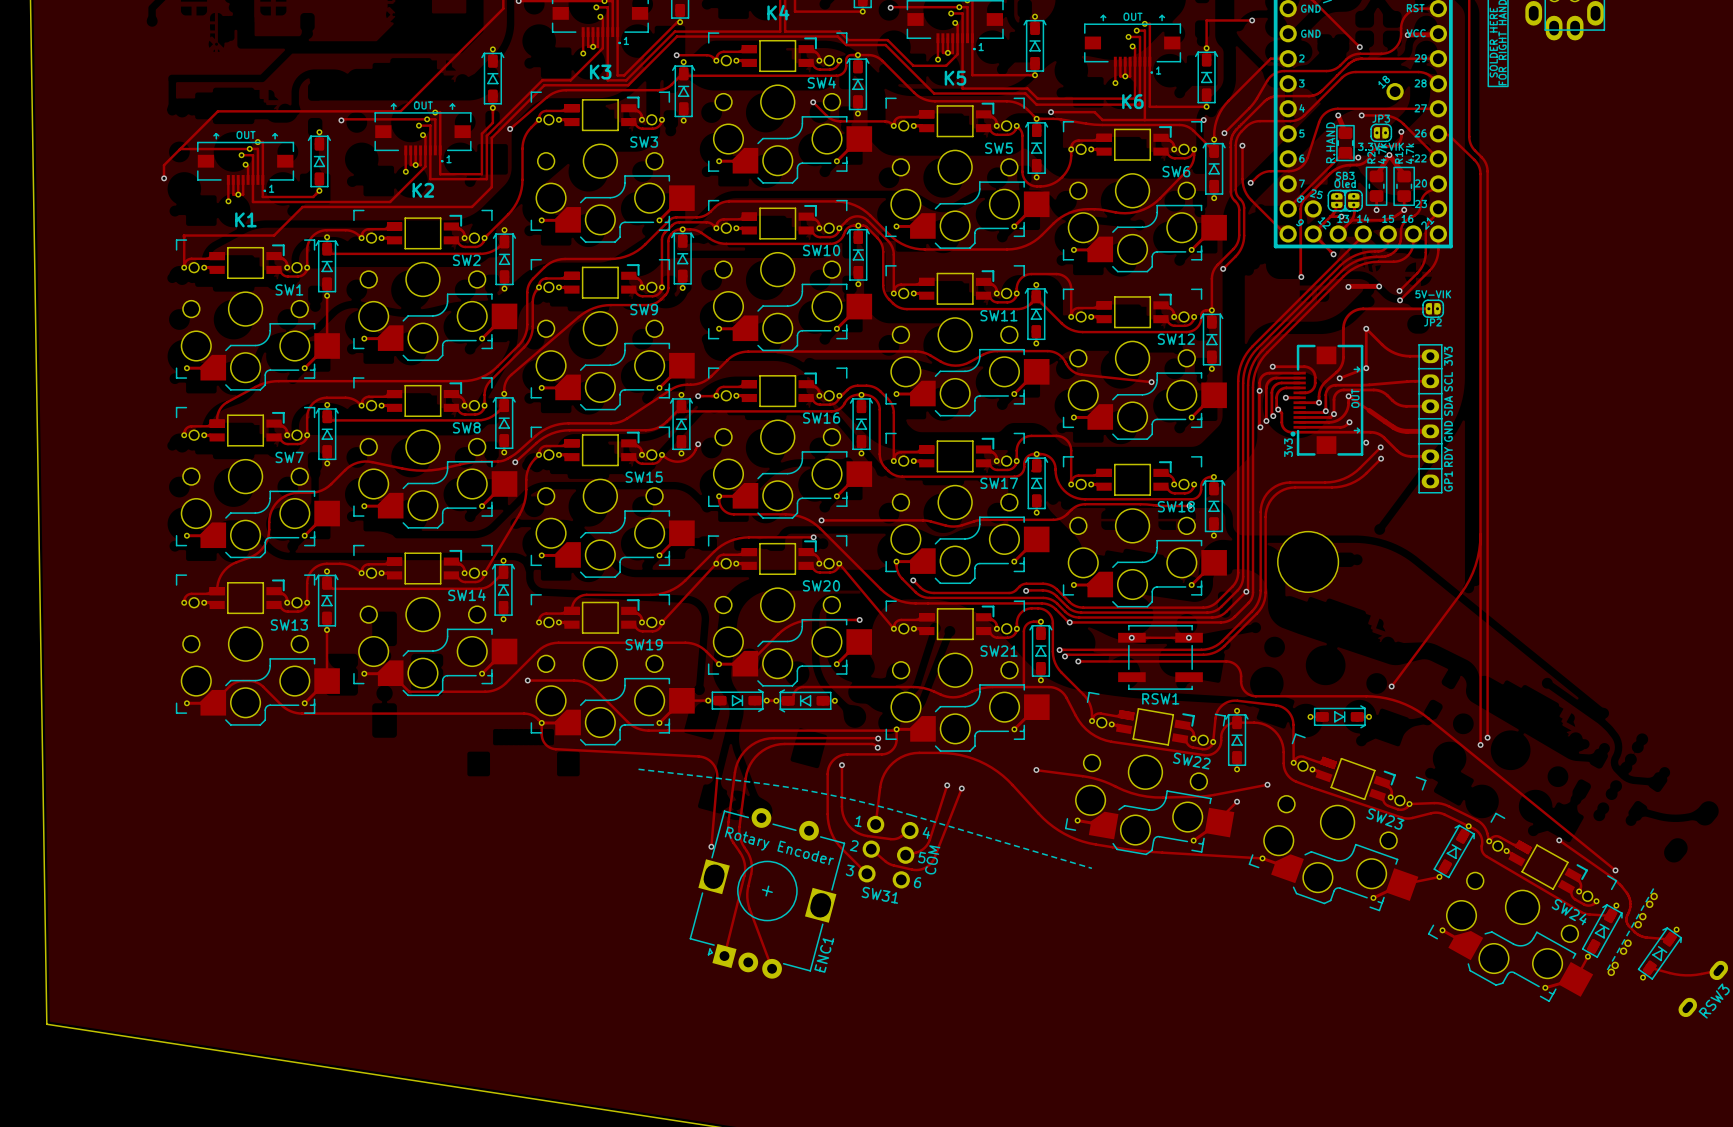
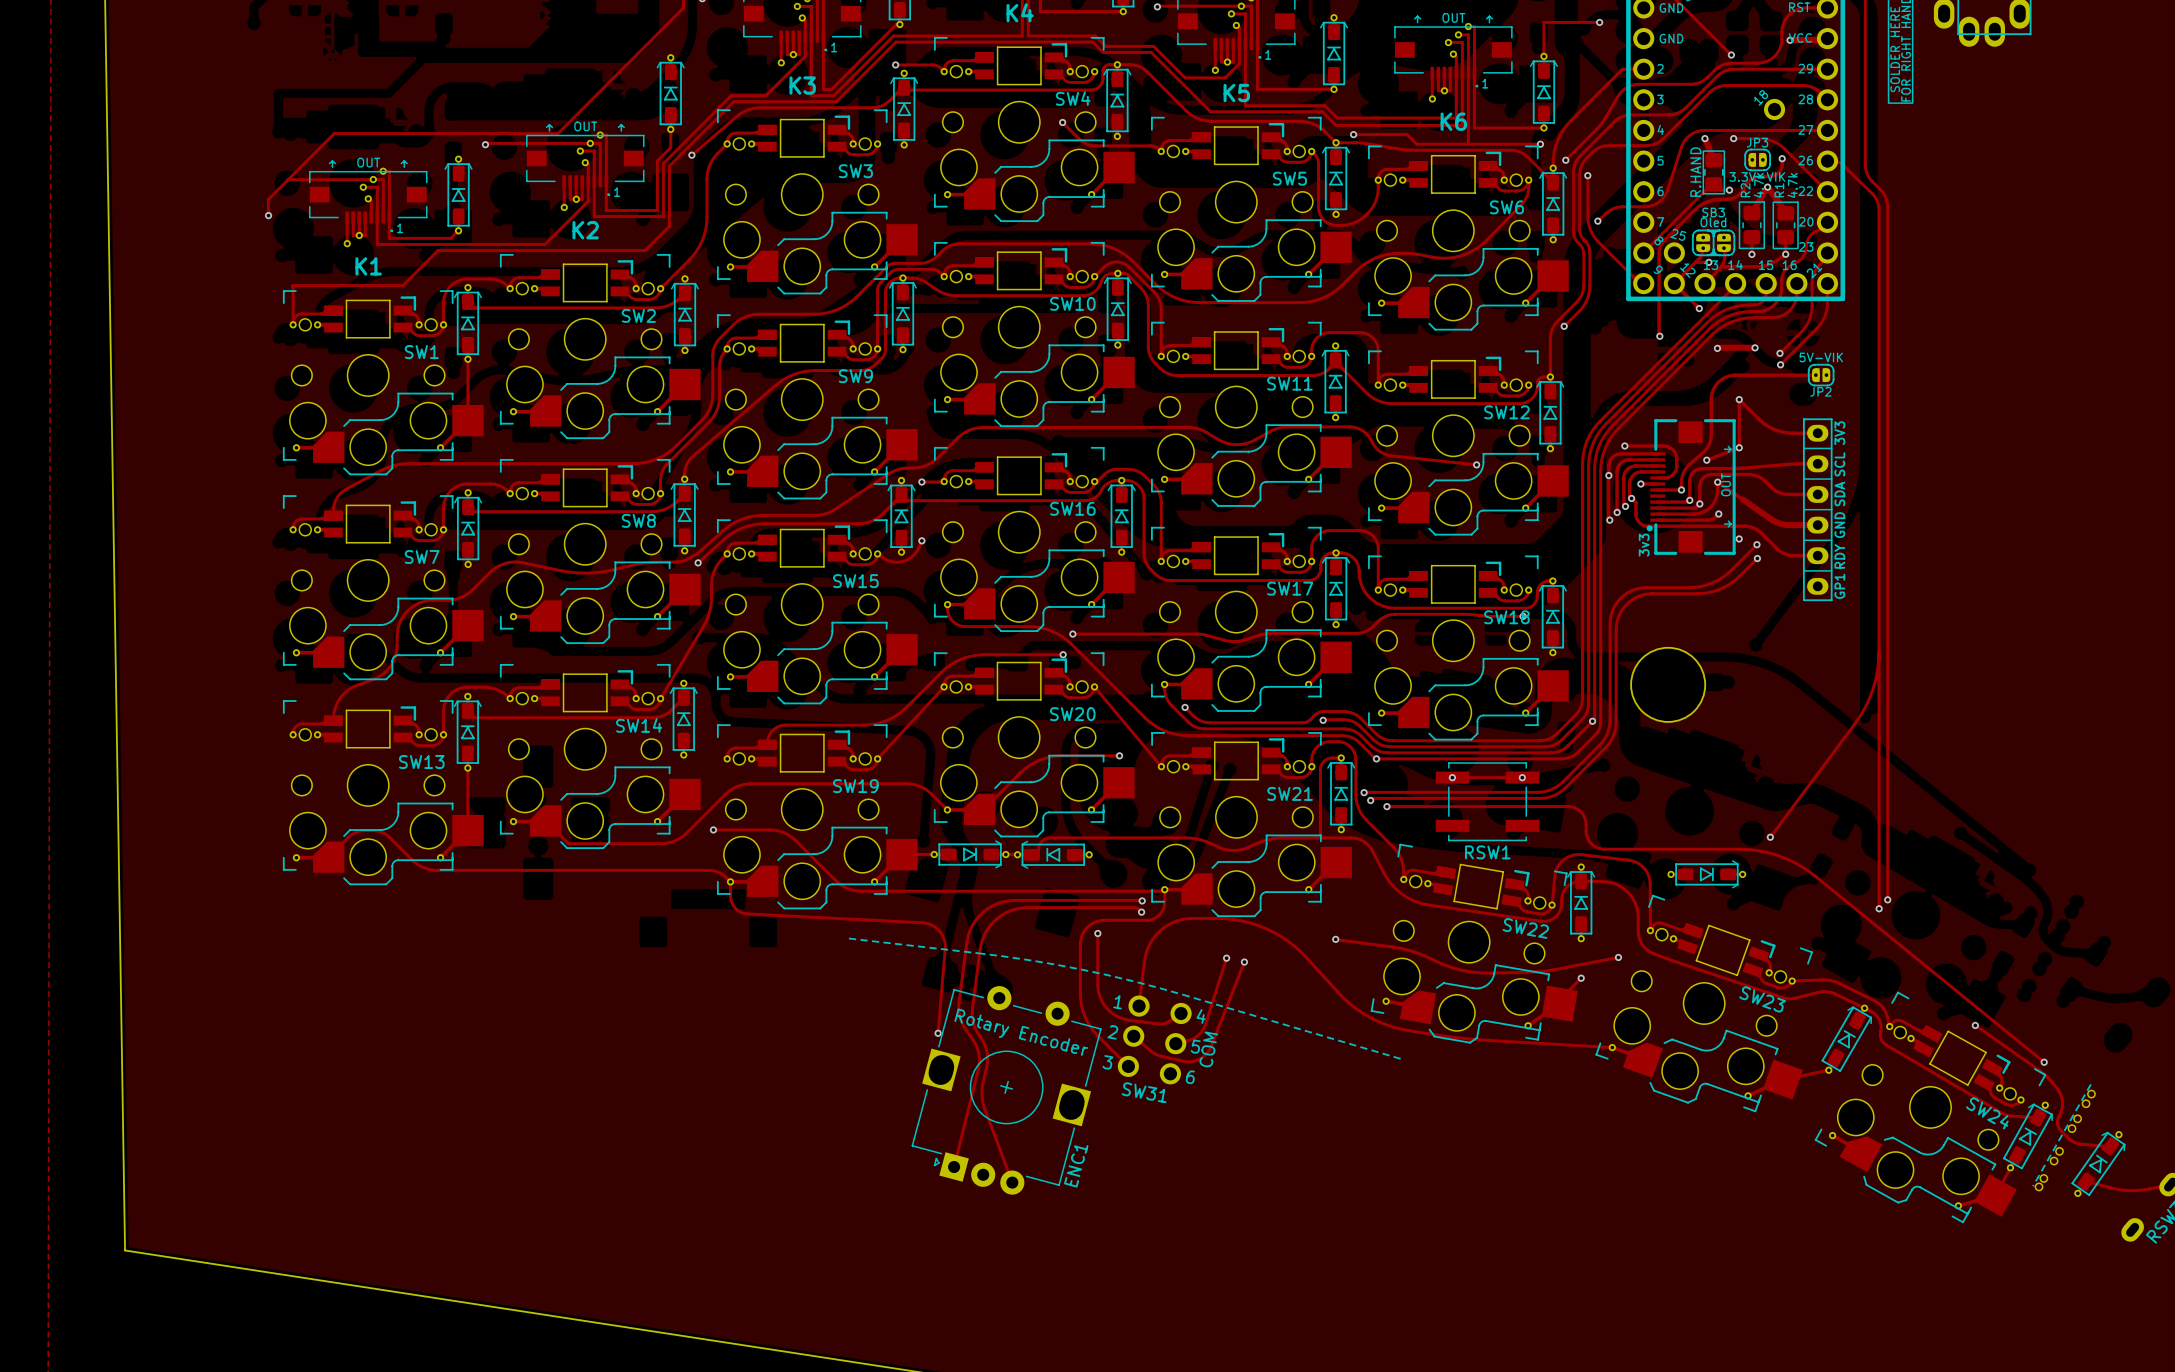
SW4 footprint: [708, 32, 873, 184] -> [933, 36, 1135, 223]
SW3 footprint: [530, 91, 695, 243] -> [716, 109, 918, 295]
SW5 footprint: [885, 97, 1050, 249] -> [1151, 116, 1352, 302]
SW6 footprint: [1062, 121, 1227, 273] -> [1368, 145, 1569, 331]
SW10 footprint: [708, 199, 873, 352] -> [933, 241, 1135, 428]
SW2 footprint: [353, 209, 518, 362] -> [499, 253, 701, 440]
SW1 footprint: [175, 239, 340, 391] -> [282, 290, 484, 476]
SW9 footprint: [530, 259, 695, 411] -> [716, 314, 918, 500]
SW11 footprint: [885, 265, 1050, 417] -> [1151, 321, 1352, 507]
SW12 footprint: [1062, 288, 1227, 440] -> [1368, 350, 1569, 536]
SW16 footprint: [708, 367, 873, 519] -> [933, 446, 1135, 632]
SW8 footprint: [353, 377, 518, 529] -> [499, 458, 701, 645]
SW7 footprint: [175, 406, 340, 559] -> [282, 495, 484, 681]
SW15 footprint: [530, 426, 695, 578] -> [716, 519, 918, 705]
SW17 footprint: [885, 432, 1050, 585] -> [1151, 526, 1352, 712]
SW18 footprint: [1062, 456, 1227, 608] -> [1368, 555, 1569, 741]
SW20 footprint: [707, 535, 873, 687] -> [933, 652, 1135, 838]
SW14 footprint: [353, 544, 518, 697] -> [499, 663, 701, 850]
SW13 footprint: [175, 574, 340, 726] -> [282, 700, 484, 886]
SW19 footprint: [530, 594, 695, 746] -> [716, 724, 918, 910]
SW21 footprint: [885, 600, 1050, 752] -> [1151, 732, 1352, 918]
SW22 footprint: [1064, 691, 1235, 856] -> [1370, 843, 1578, 1044]
SW23 footprint: [1248, 733, 1427, 912] -> [1595, 894, 1813, 1113]
SW24 footprint: [1427, 812, 1618, 1002] -> [1814, 991, 2047, 1224]

